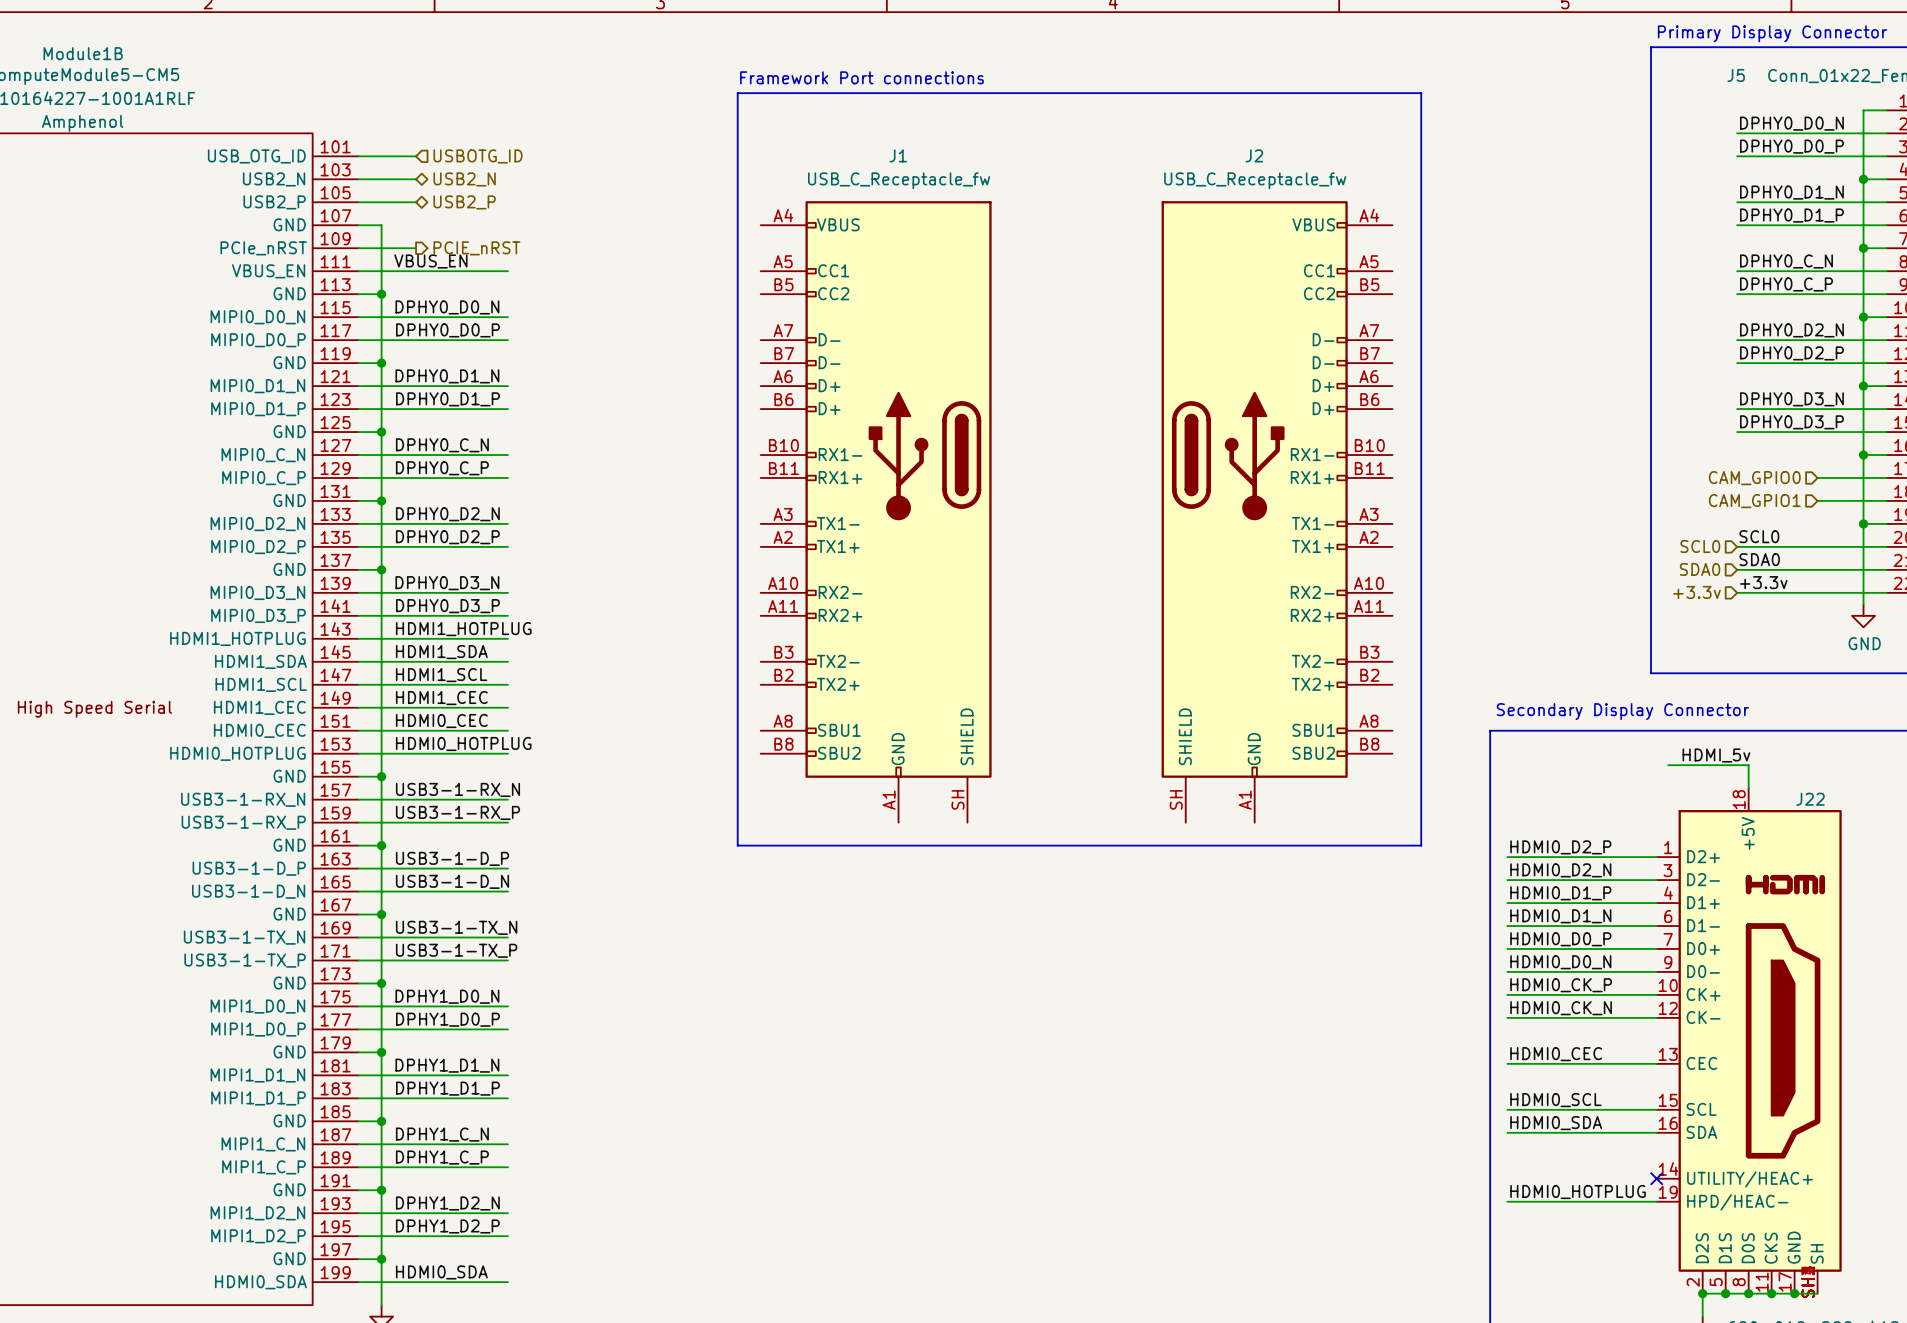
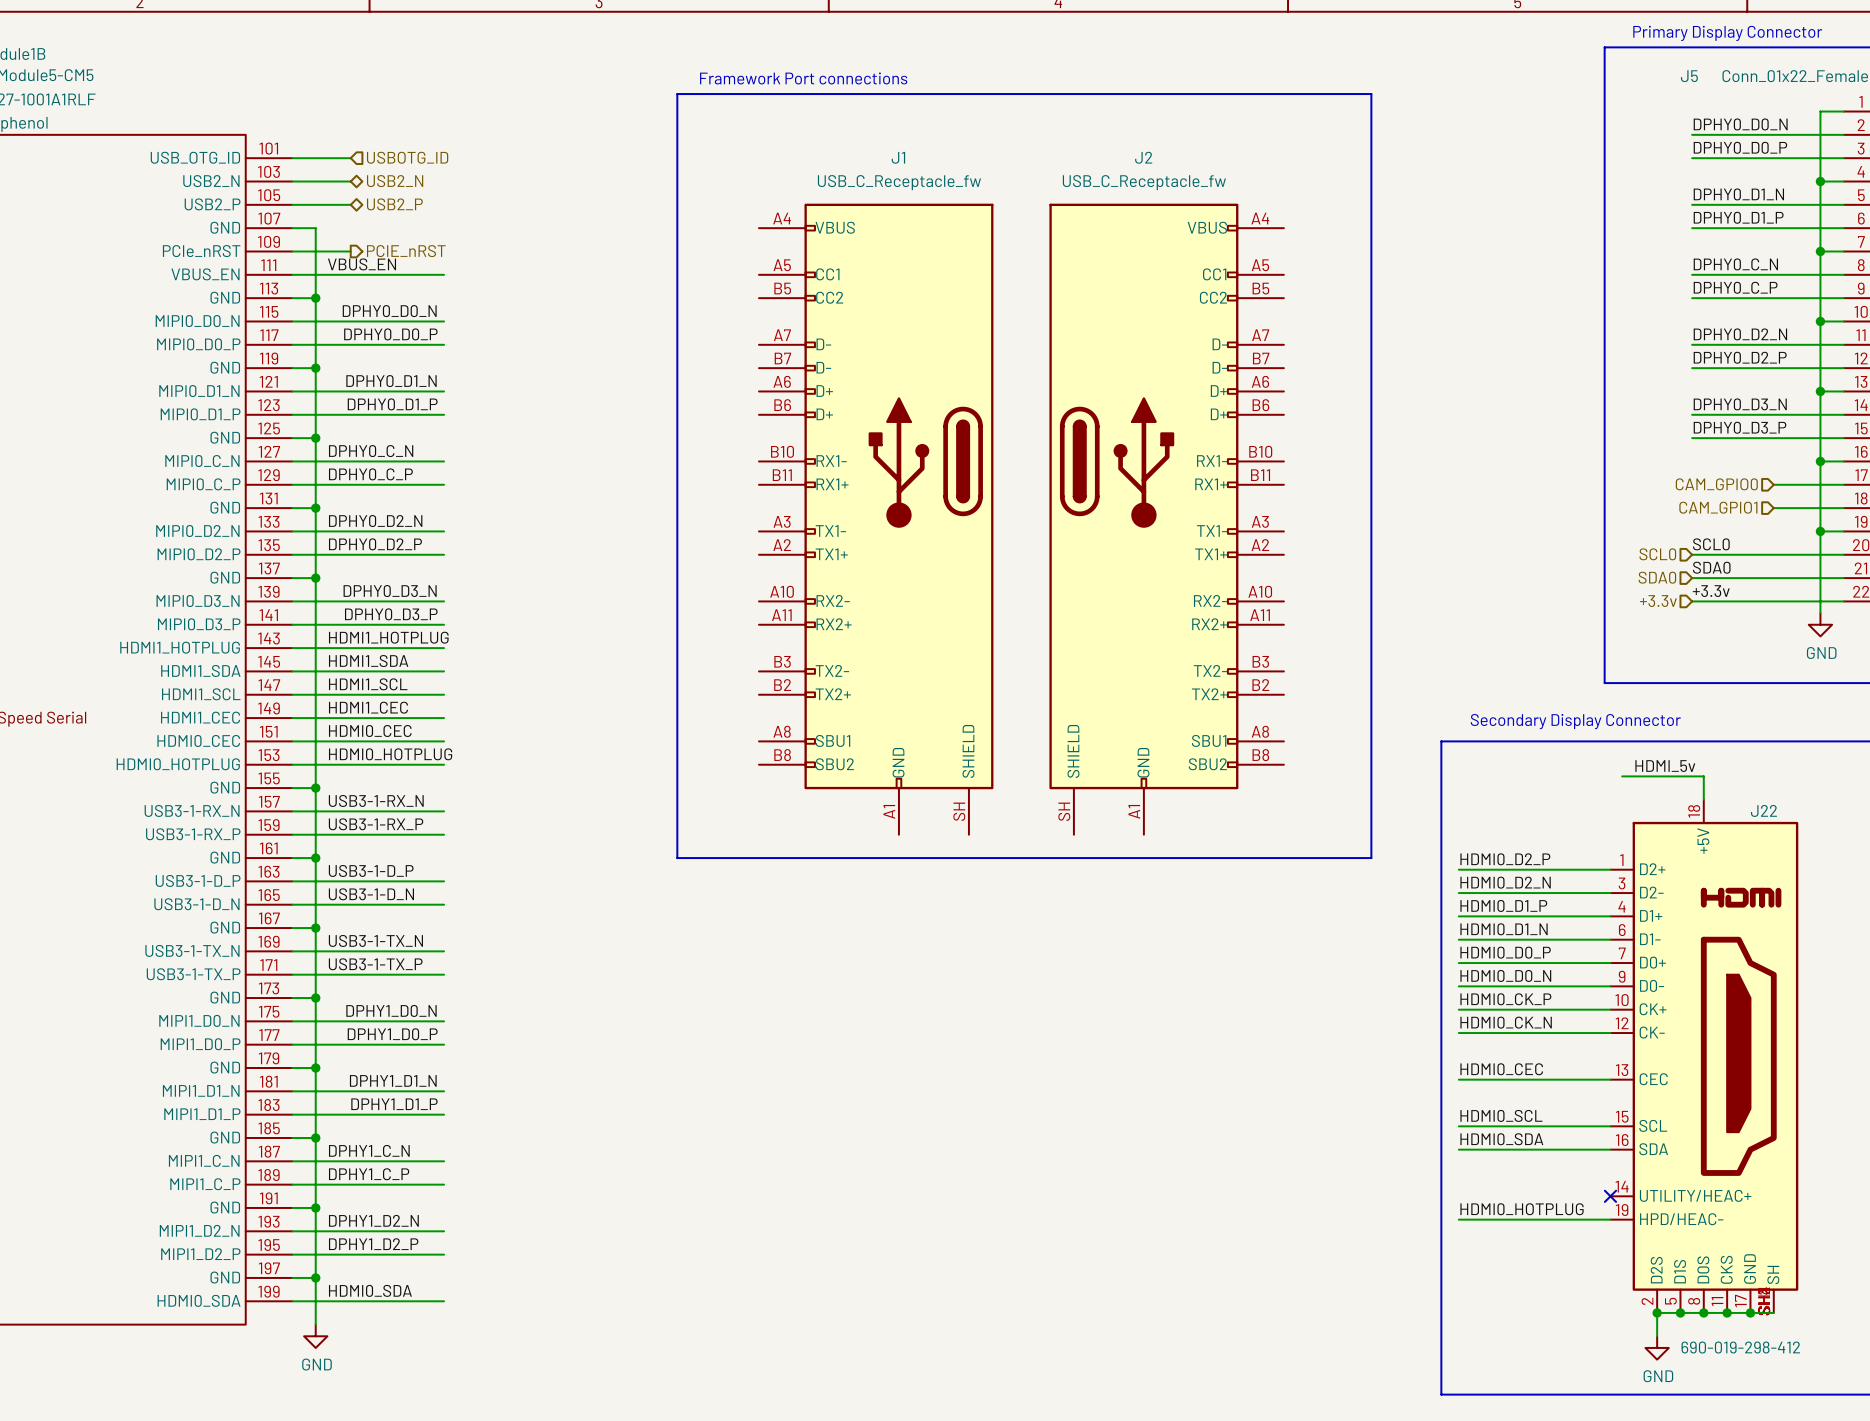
J1 position: (876, 511) -> (876, 519)
J2 position: (1277, 511) -> (1166, 519)

